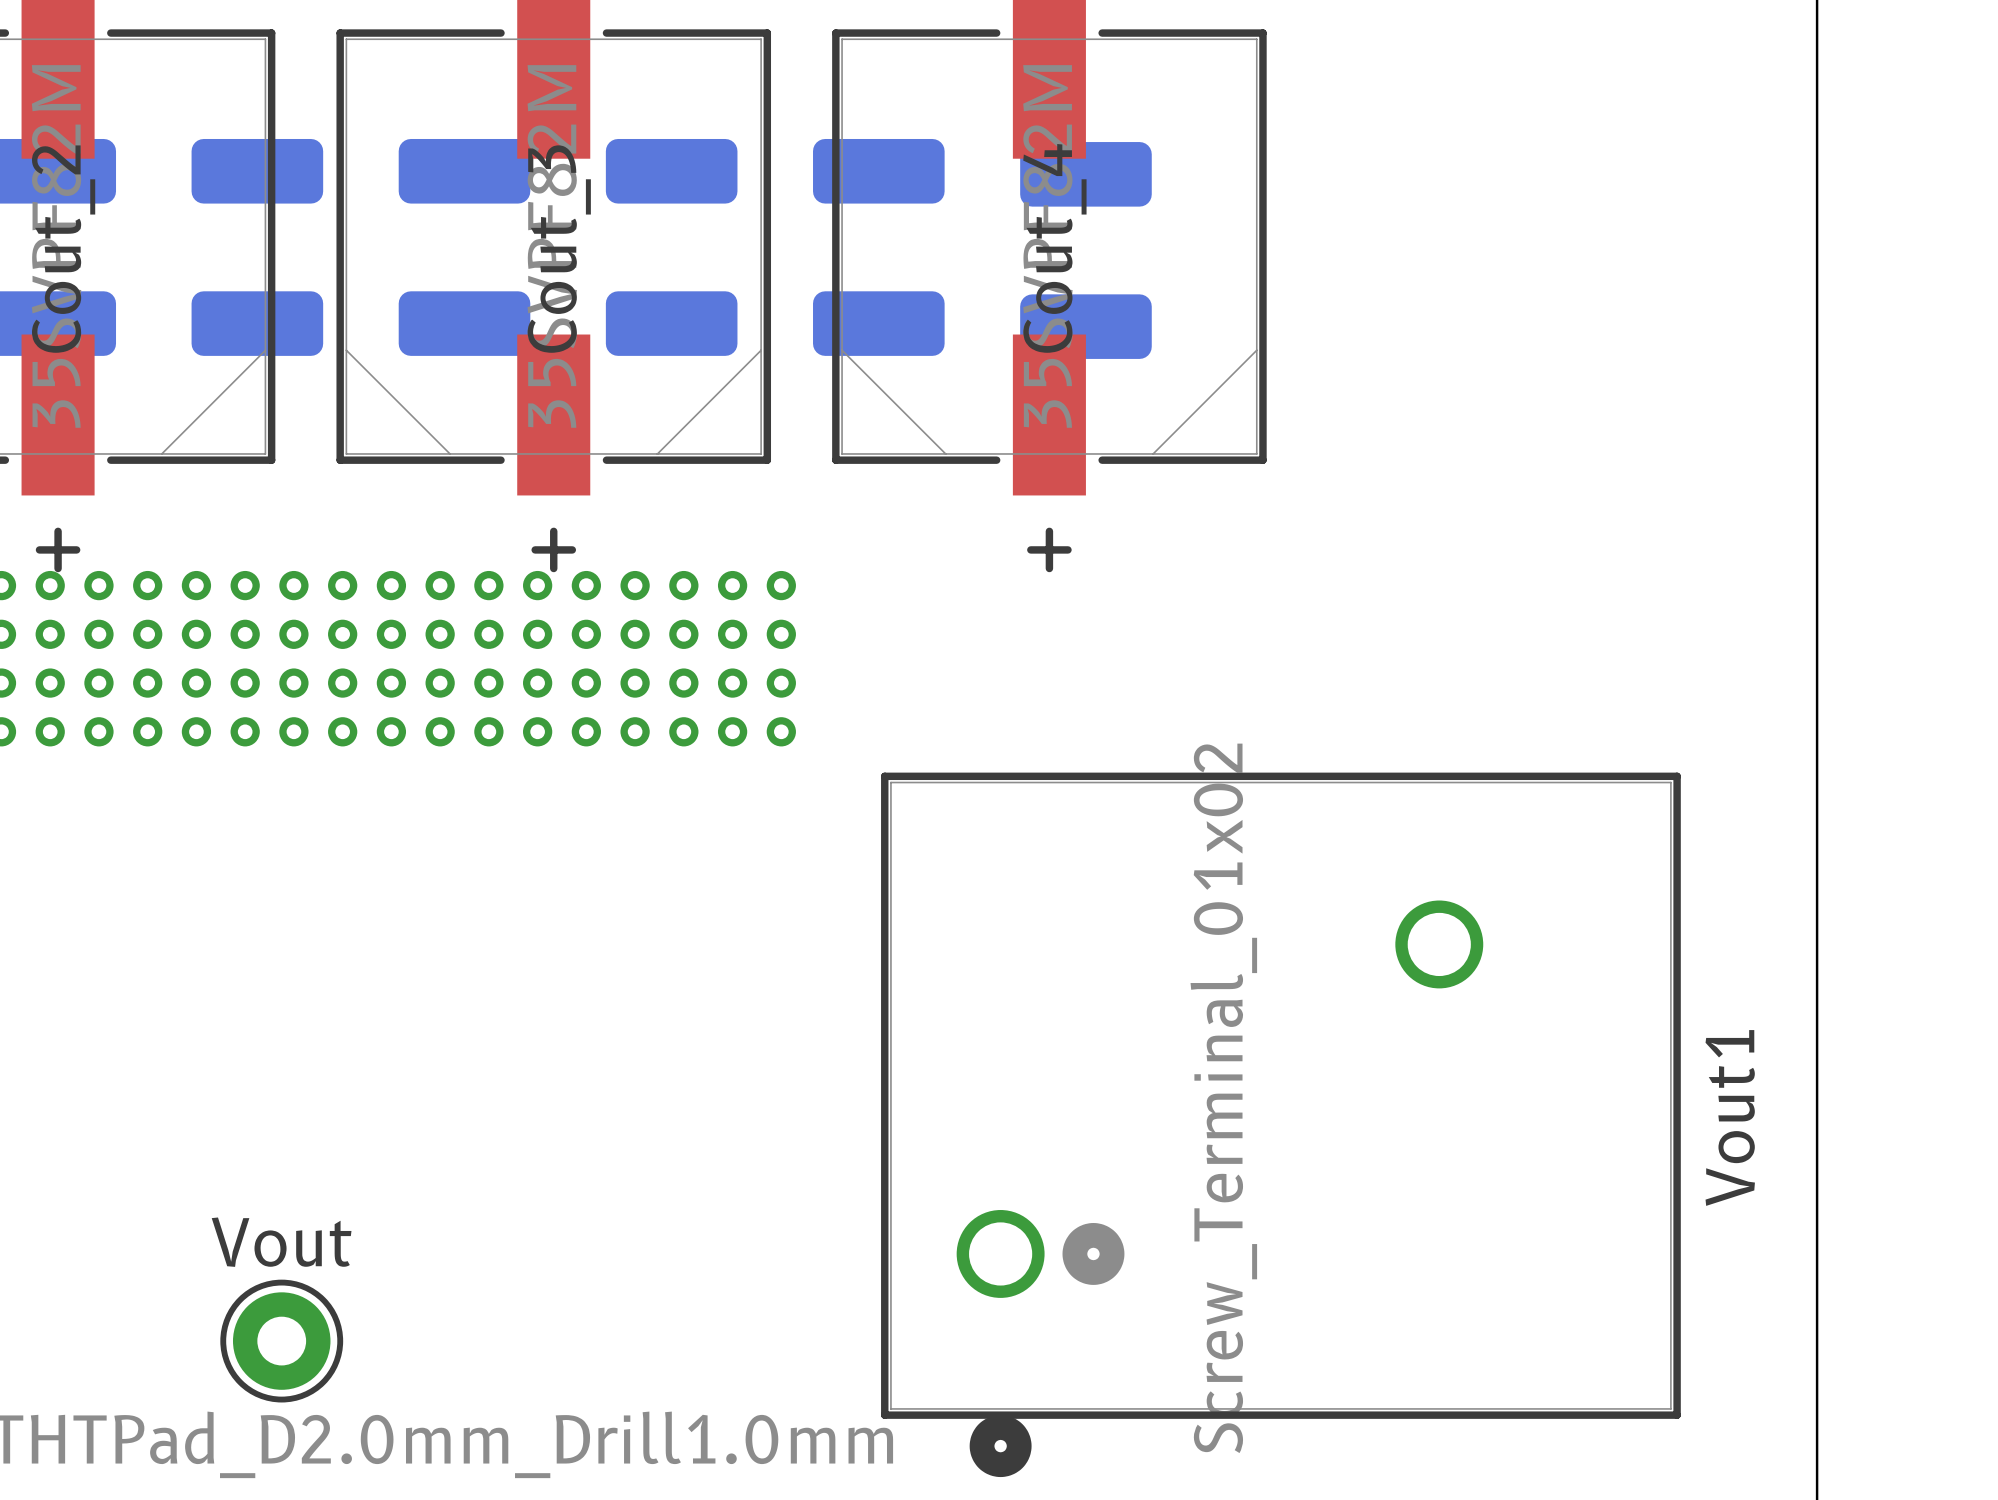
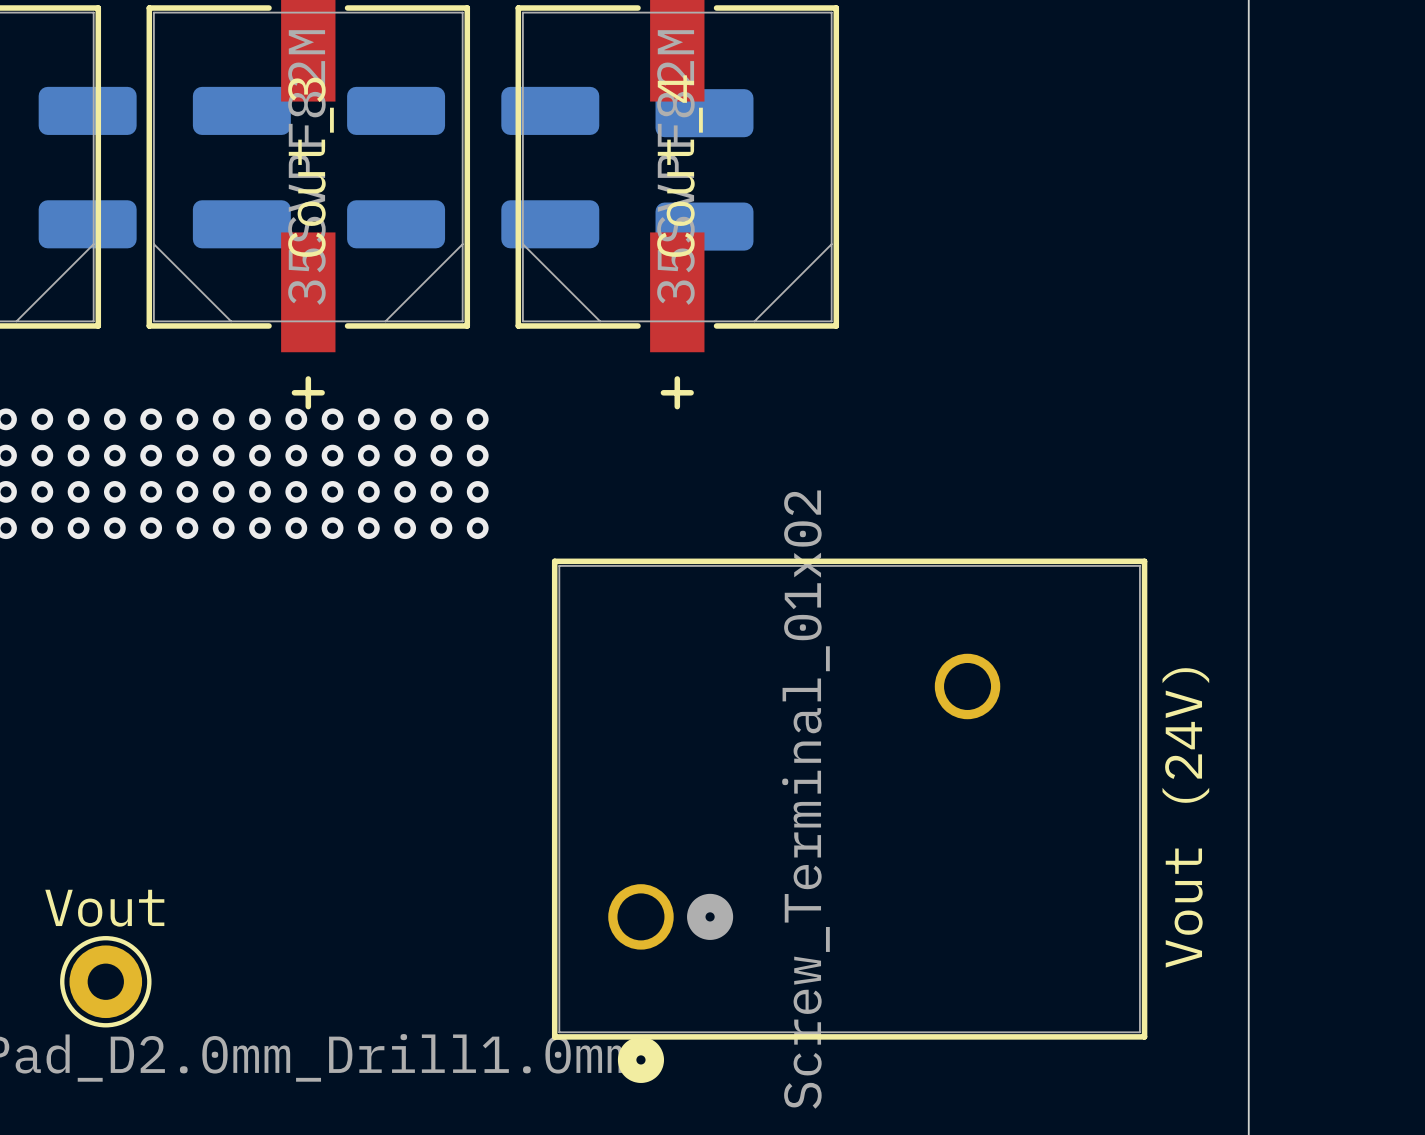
Vout1 name: Vout1 (1730, 1117) -> Vout (24V) (1185, 817)

